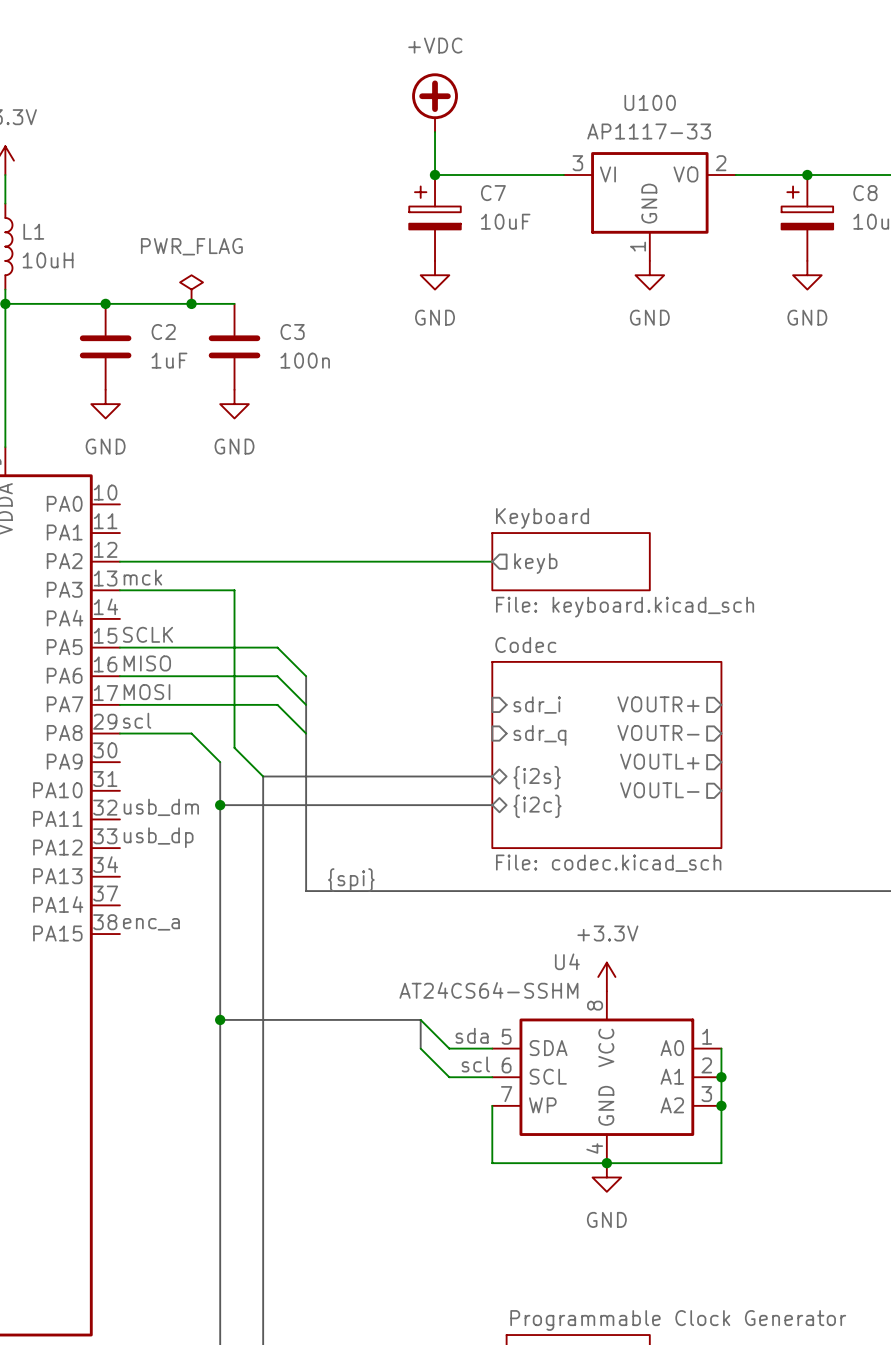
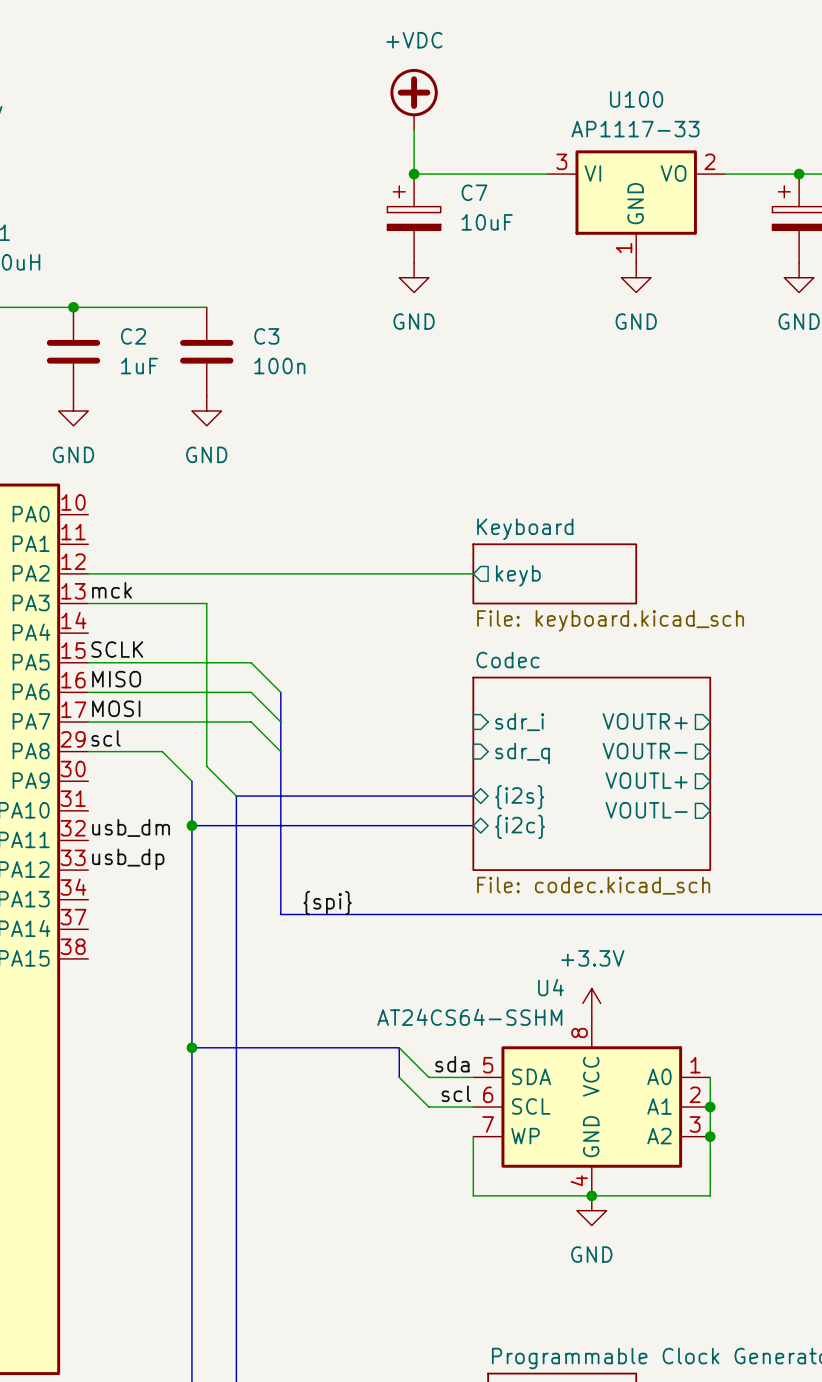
power symbol: PWR_FLAG (191, 289) -> none
junction: (191, 303) -> none
label: enc_a (151, 924) -> none

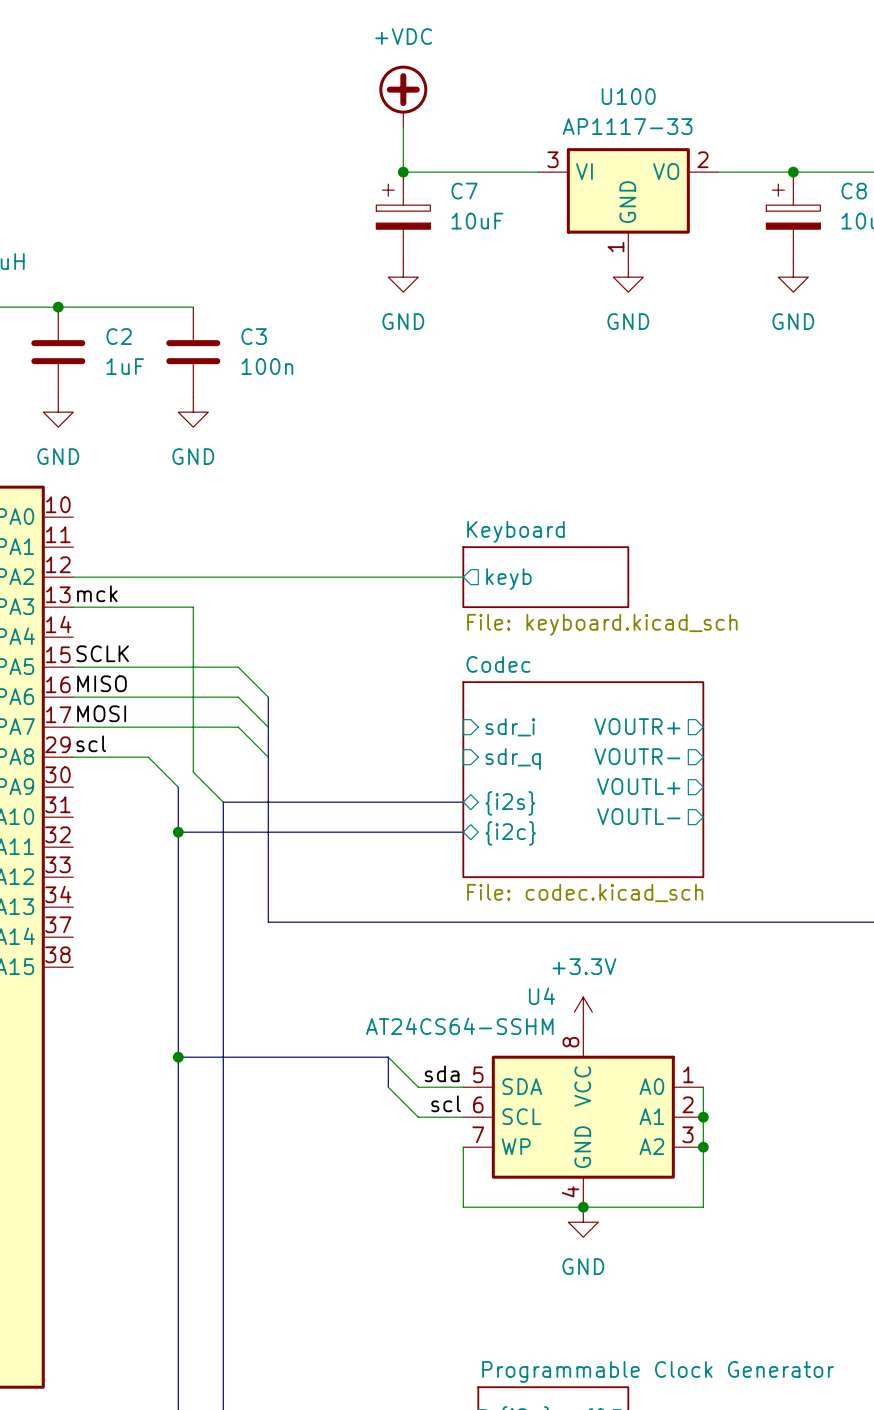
label: usb_dm (131, 827) -> none
label: usb_dp (128, 859) -> none
label: {spi} (327, 903) -> none

